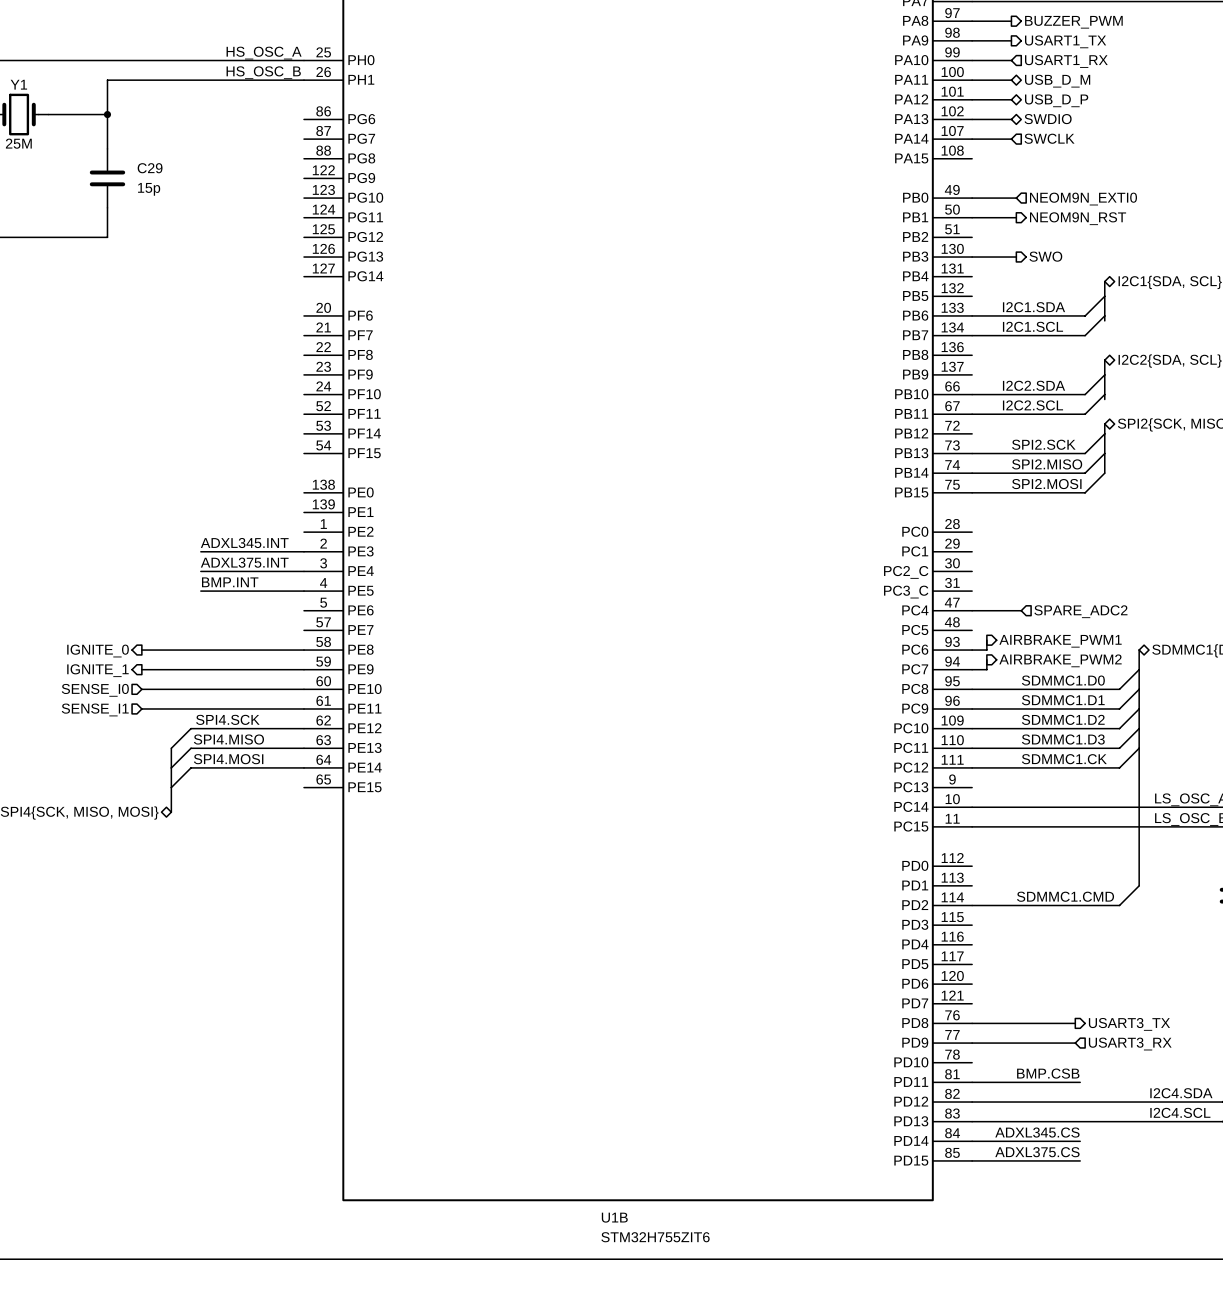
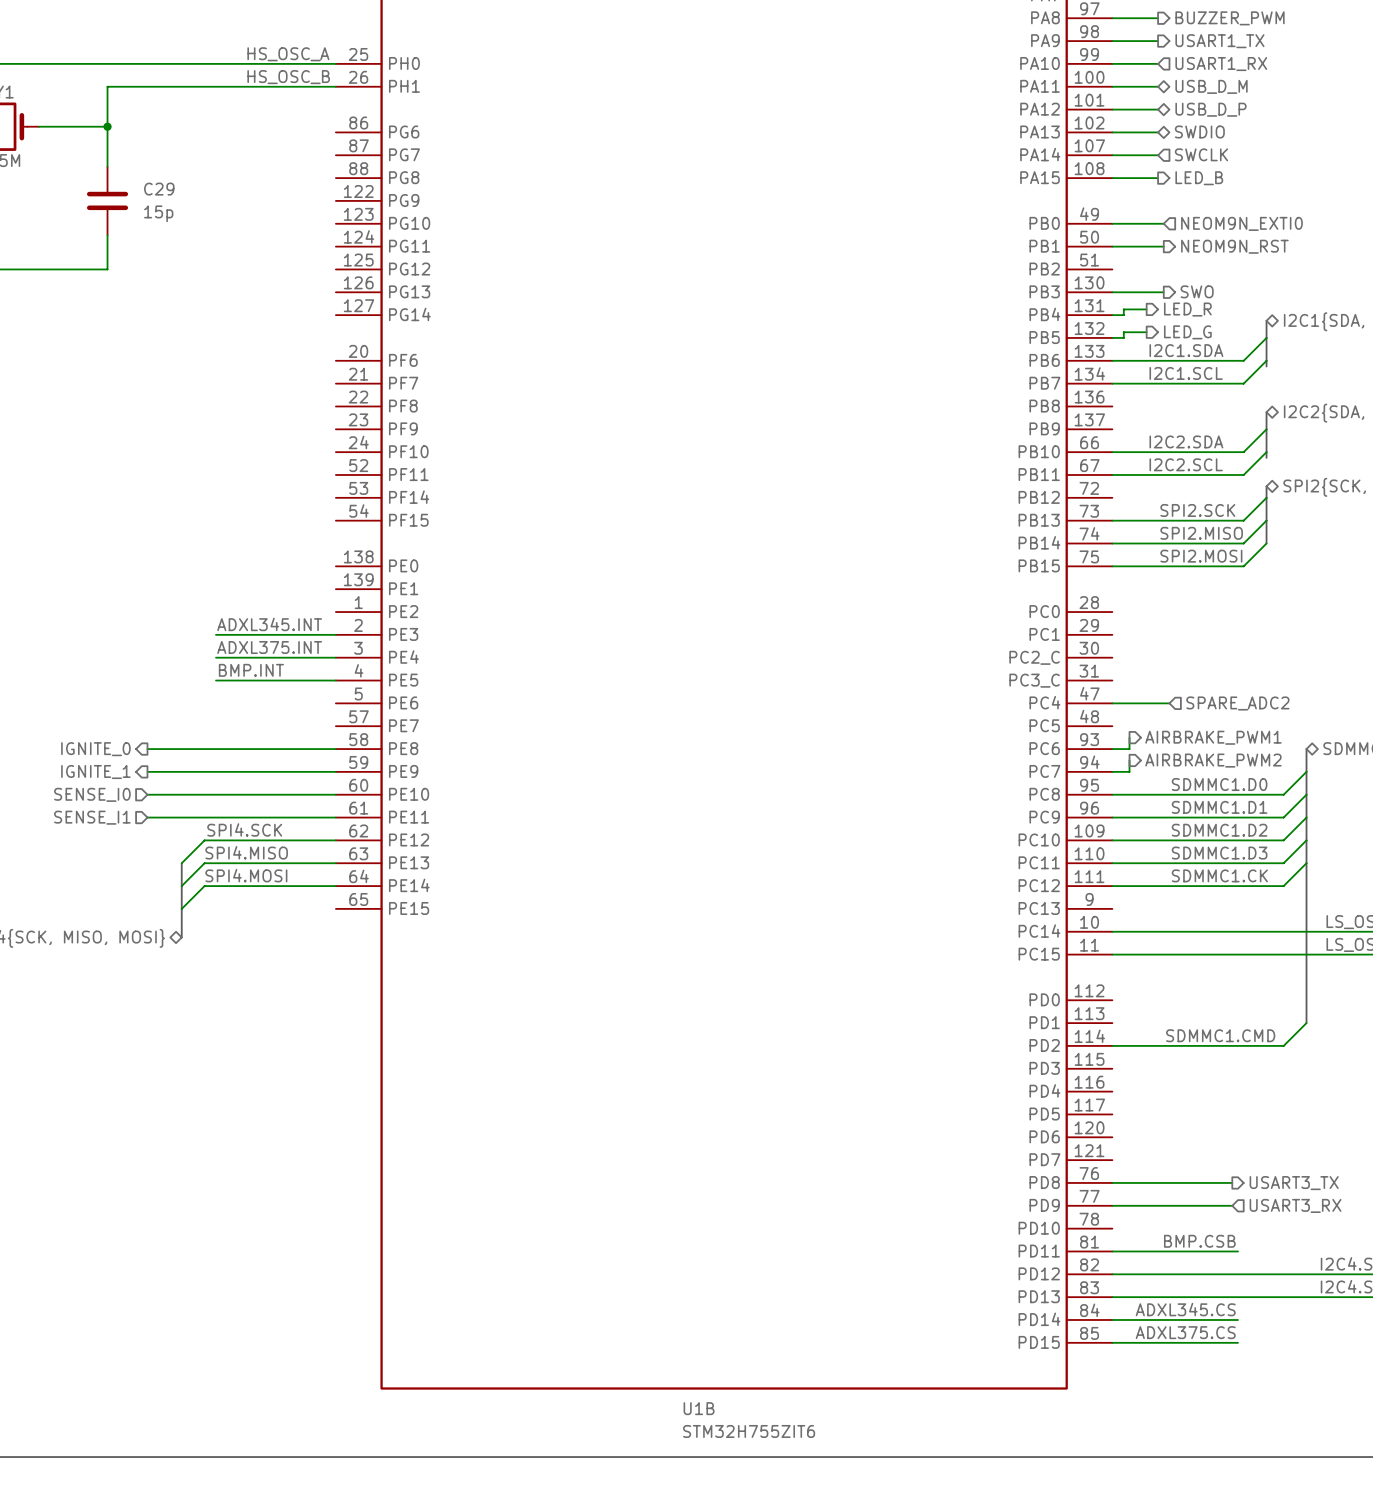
wire: none -> (1112, 178) (1158, 178)
hierarchical label: none -> LED_B (1199, 178)
wire: none -> (1146, 309) (1123, 309) (1123, 315) (1112, 315)
hierarchical label: none -> LED_R (1187, 309)
wire: none -> (1146, 332) (1123, 332) (1123, 337) (1112, 337)
hierarchical label: none -> LED_G (1187, 332)

